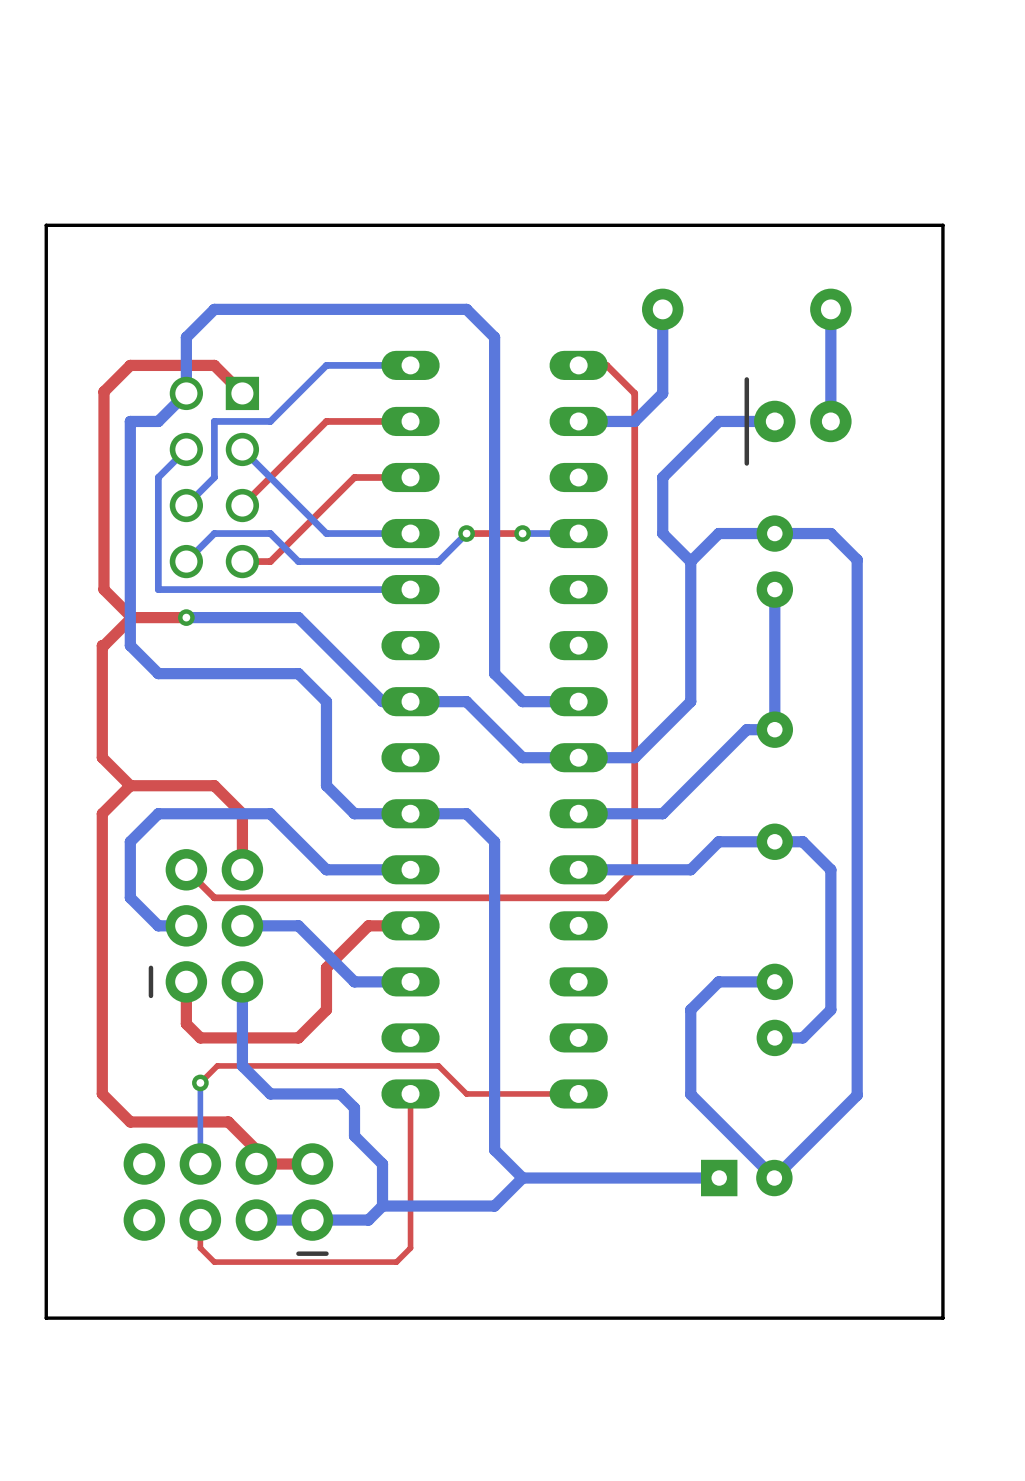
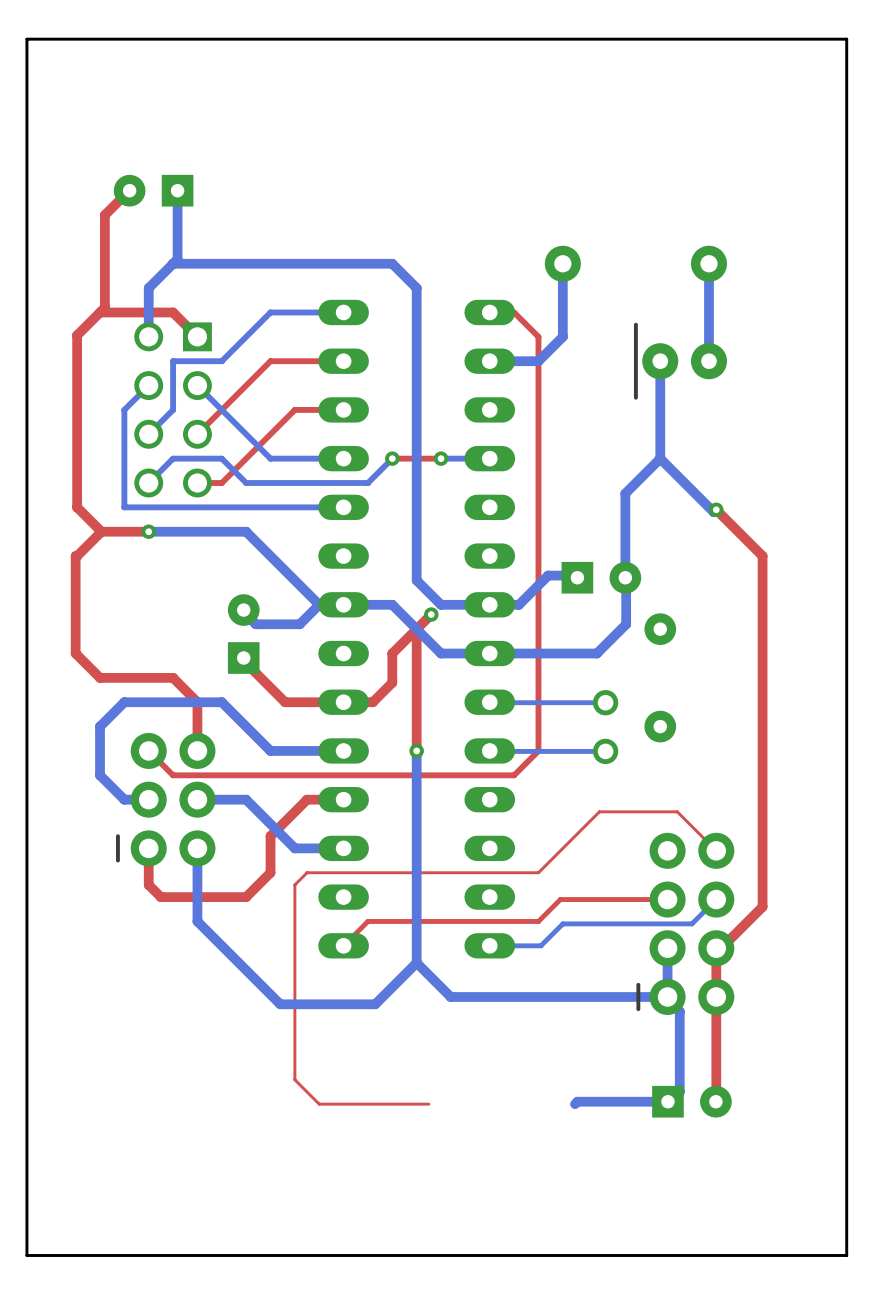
board edge: (46, 225) (942, 225) (942, 1318) (46, 1318) -> (26, 190) (26, 39) (846, 39) (846, 1255) (26, 1255) (26, 1140)
top track: none -> (129, 190) (104, 215) (104, 307) (100, 312)
part: none -> (153, 190)
bottom track: none -> (177, 190) (177, 259) (173, 263)
bottom track: (186, 393) (158, 421) (130, 421) (130, 645) (158, 673) (298, 673) (326, 701) (326, 785) (354, 813) (466, 813) (494, 841) (494, 869) -> none
bottom track: (774, 421) (718, 421) (662, 477) (662, 533) (690, 561) -> (660, 361) (660, 458)
bottom track: none -> (660, 458) (713, 512) (716, 509)
bottom track: (690, 561) (690, 701) (634, 757) -> (660, 458) (625, 493) (626, 624) (596, 653) (538, 653)
bottom track: (690, 561) (718, 533) (830, 533) (857, 559) (857, 1095) (774, 1178) (690, 1094) (690, 1009) (718, 981) (774, 981) -> none
part: (774, 561) -> none
bottom track: (774, 589) (774, 729) (746, 729) (662, 813) (578, 813) -> (605, 702) (489, 702)
top track: none -> (716, 509) (762, 556) (762, 906) (721, 948) (716, 948) (715, 1101)
via: none -> (716, 509)
bottom track: none -> (577, 577) (575, 575) (548, 575) (518, 604) (489, 604)
part: none -> (601, 577)
bottom track: none -> (319, 604) (299, 624) (255, 624) (243, 610)
top track: none -> (431, 614) (392, 653) (392, 682) (372, 702) (285, 702) (243, 660) (243, 658)
via: none -> (431, 614)
top track: none -> (416, 629) (416, 750)
part: none -> (243, 634)
top track: (130, 785) (102, 813) (102, 1093) (130, 1121) (228, 1121) (256, 1150) (256, 1164) (312, 1164) (312, 1150) -> none
part: none -> (605, 727)
via: none -> (416, 750)
bottom track: (578, 869) (690, 869) (718, 841) (802, 841) (830, 869) (830, 1009) (802, 1037) (774, 1037) -> (489, 750) (605, 751)
top track: none -> (716, 850) (677, 811) (599, 811) (538, 872) (307, 872) (294, 884) (294, 1079) (319, 1104) (428, 1104)
part: (774, 1009) -> none
bottom track: none -> (716, 899) (691, 923) (562, 923) (540, 945) (489, 945)
part: none -> (685, 923)
bottom track: (200, 1082) (200, 1164) -> none
top track: (200, 1082) (217, 1065) (438, 1065) (466, 1093) (578, 1093) -> none
via: (200, 1082) -> none
bottom track: (270, 1093) (340, 1093) (354, 1107) (354, 1135) (382, 1164) (382, 1206) -> (221, 945) (280, 1004) (375, 1004) (416, 962) (450, 996) (667, 996)
top track: (410, 1093) (410, 1248) (396, 1262) (214, 1262) (200, 1248) (200, 1220) -> (343, 945) (367, 921) (538, 921) (560, 899) (667, 899)
bottom track: none -> (667, 948) (667, 999) (679, 1011) (679, 1091) (670, 1101) (577, 1101) (575, 1104)
bottom track: (494, 1113) (494, 1150) (522, 1178) -> none
bottom track: (522, 1178) (494, 1206) (382, 1206) -> none
bottom track: (719, 1178) (522, 1178) -> none
part position: (746, 1178) -> (691, 1101)
part: (228, 1199) -> none
bottom track: (382, 1206) (368, 1220) (256, 1220) -> none

